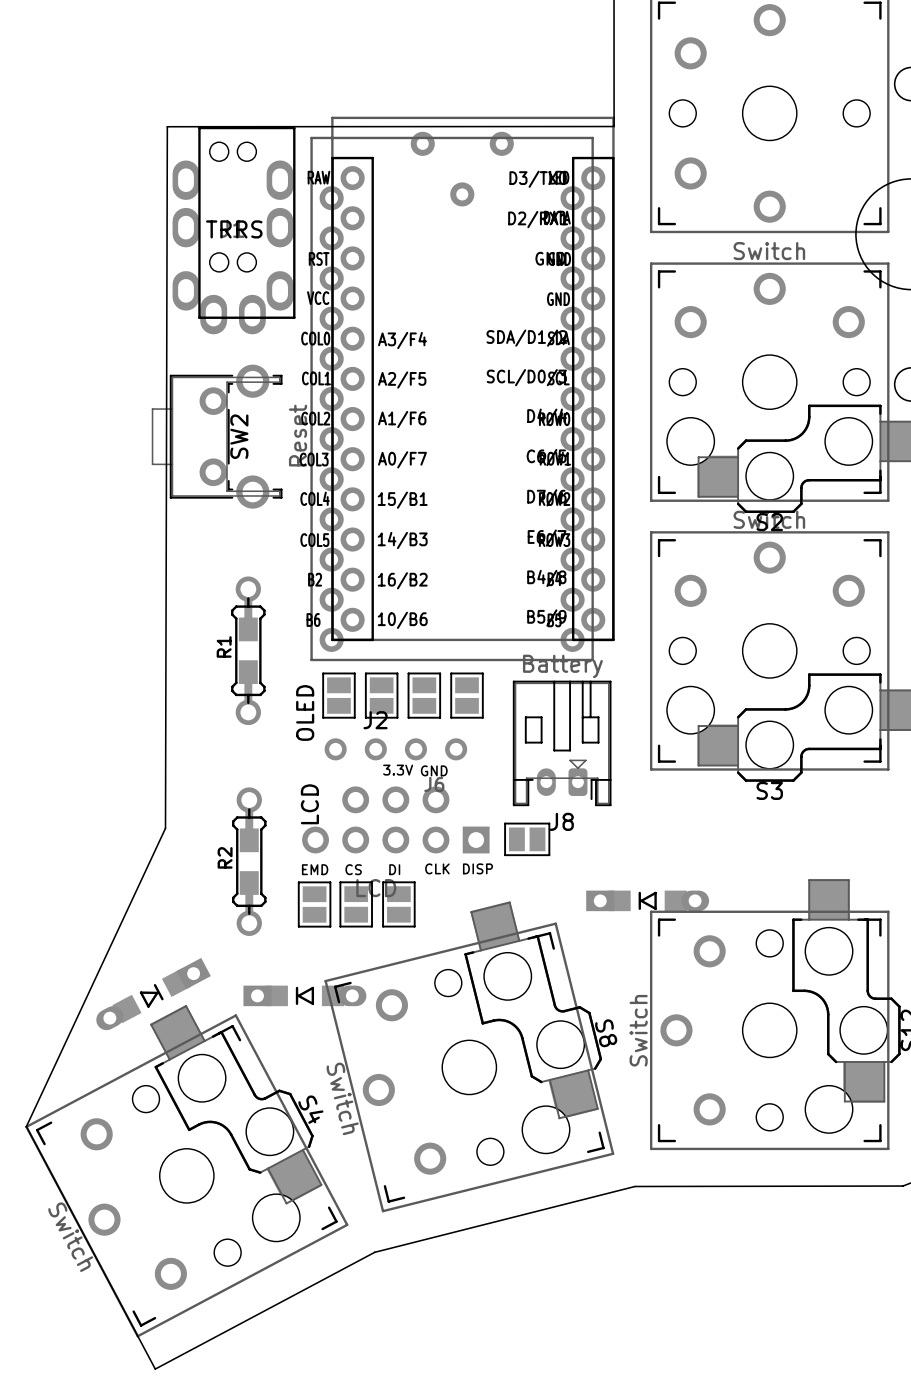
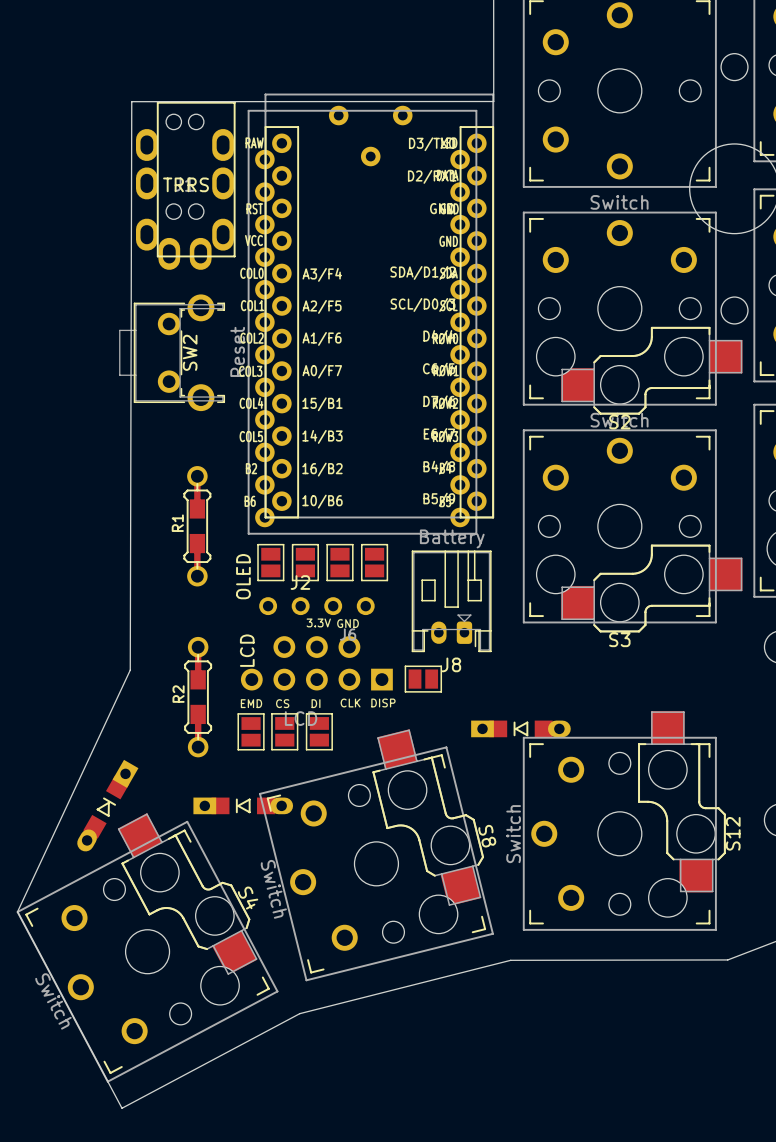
part rotation: 0° (153, 994) -> 32° counterclockwise (107, 805)

